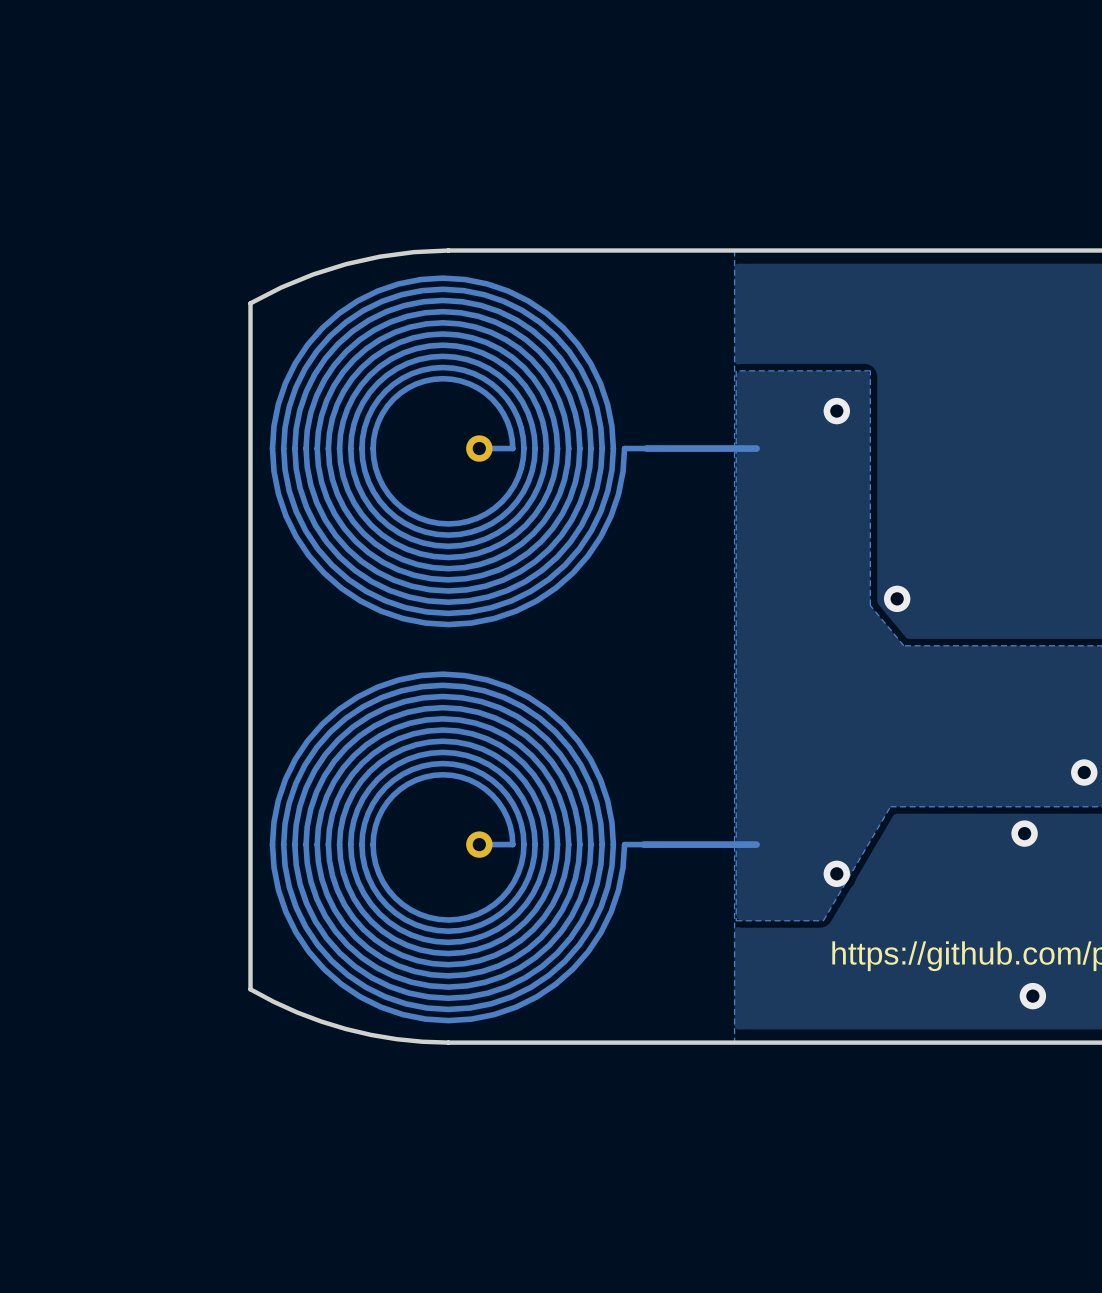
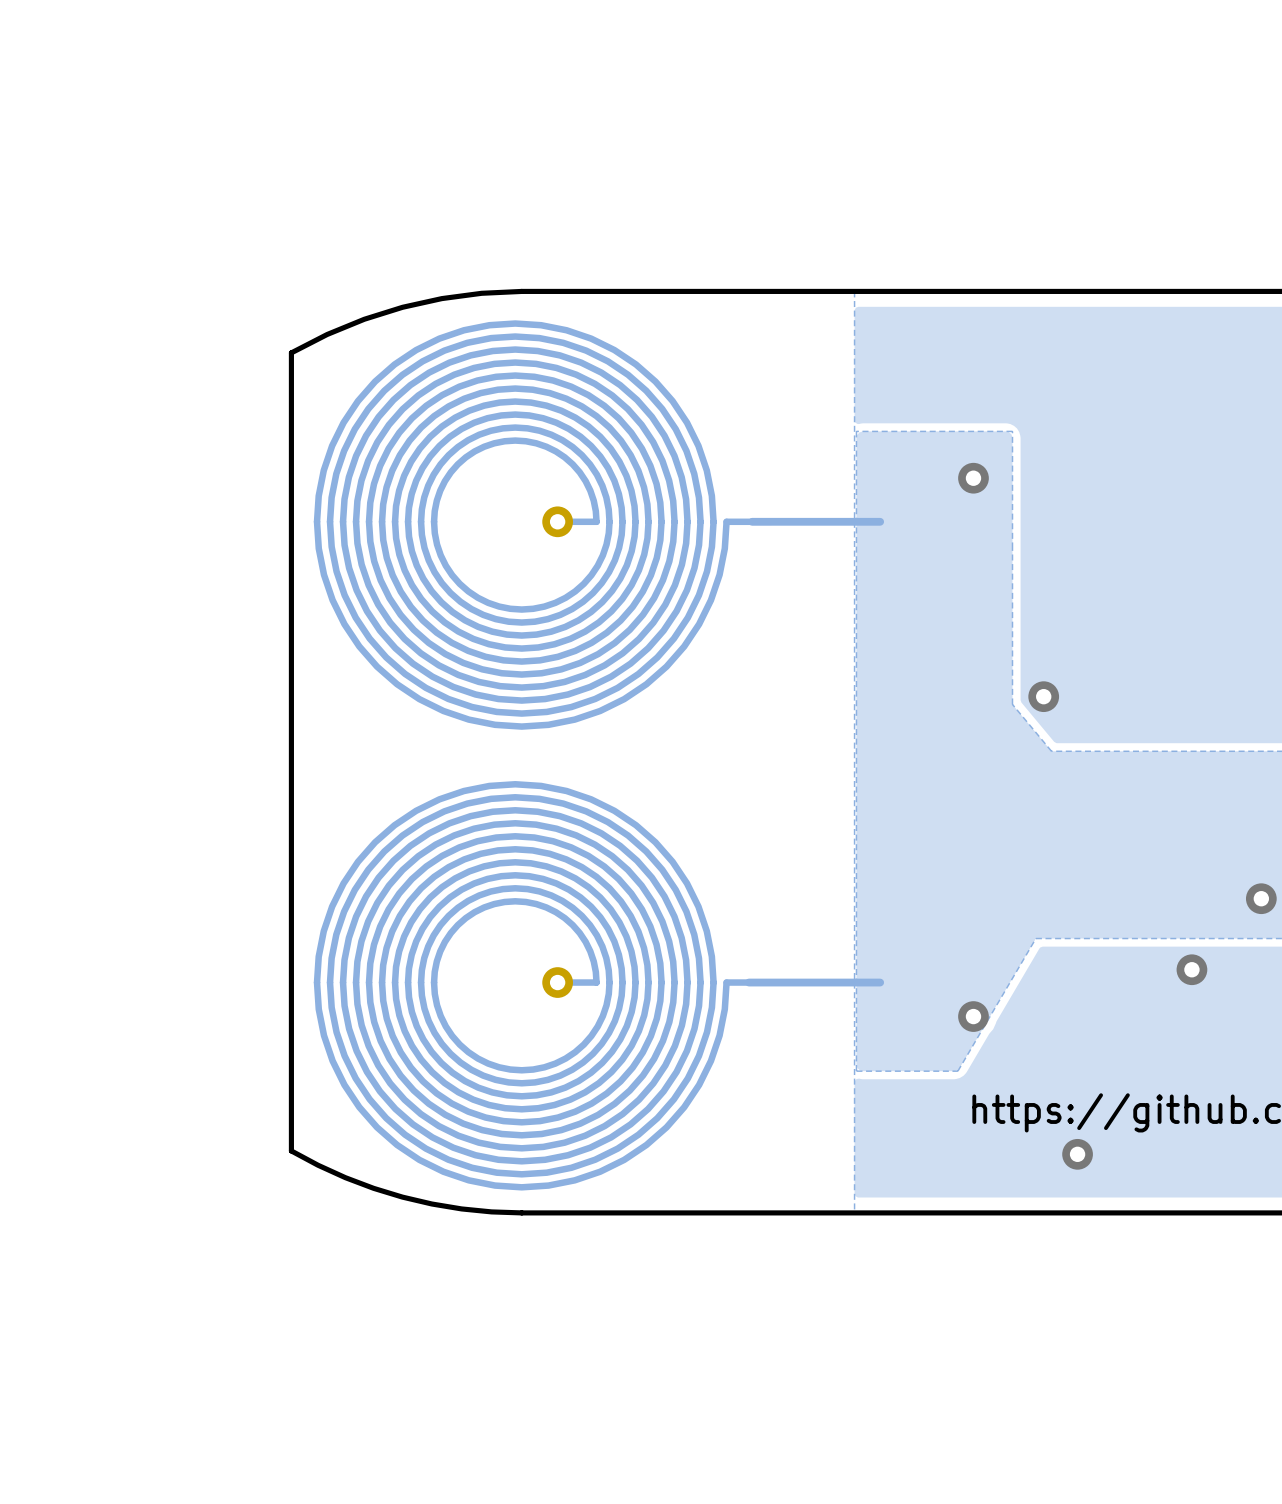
via position: (1032, 996) -> (1077, 1154)

